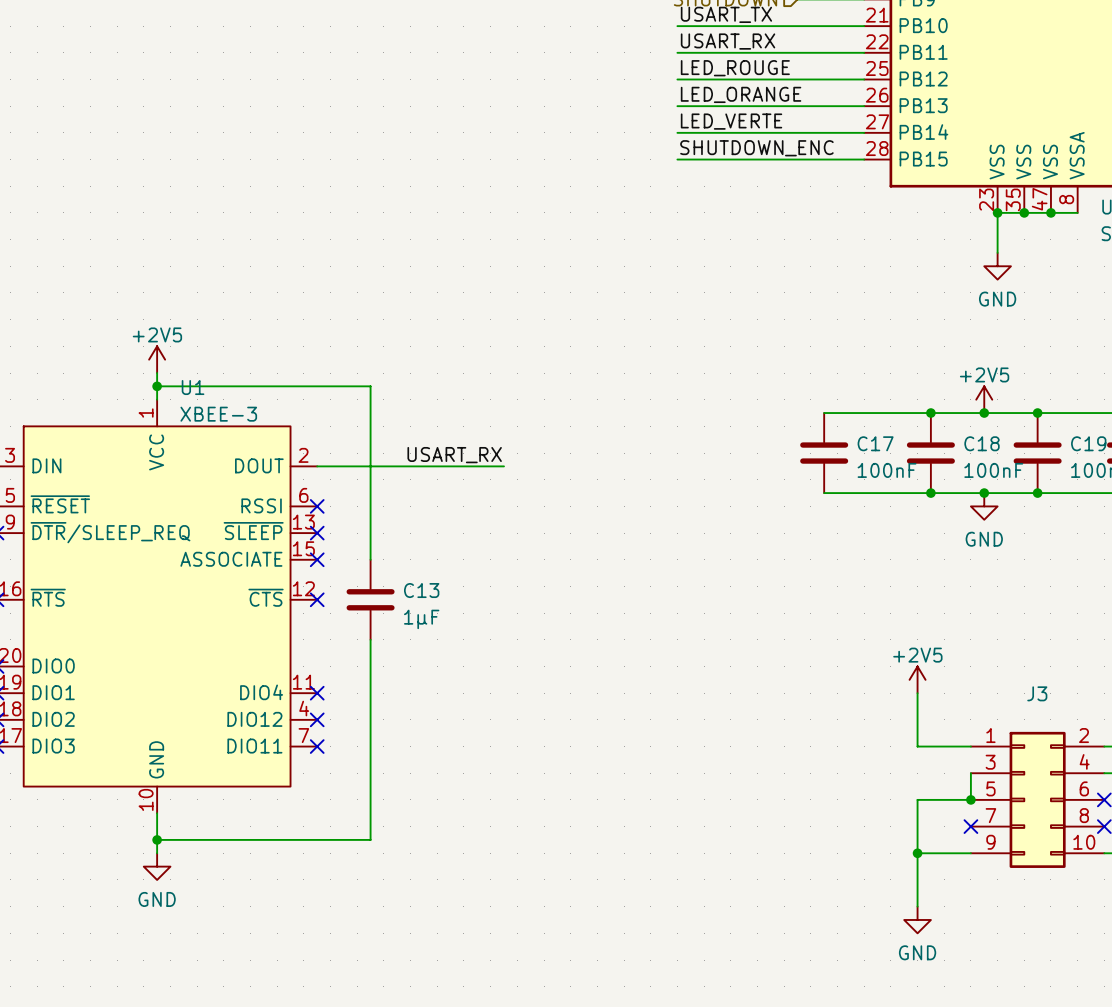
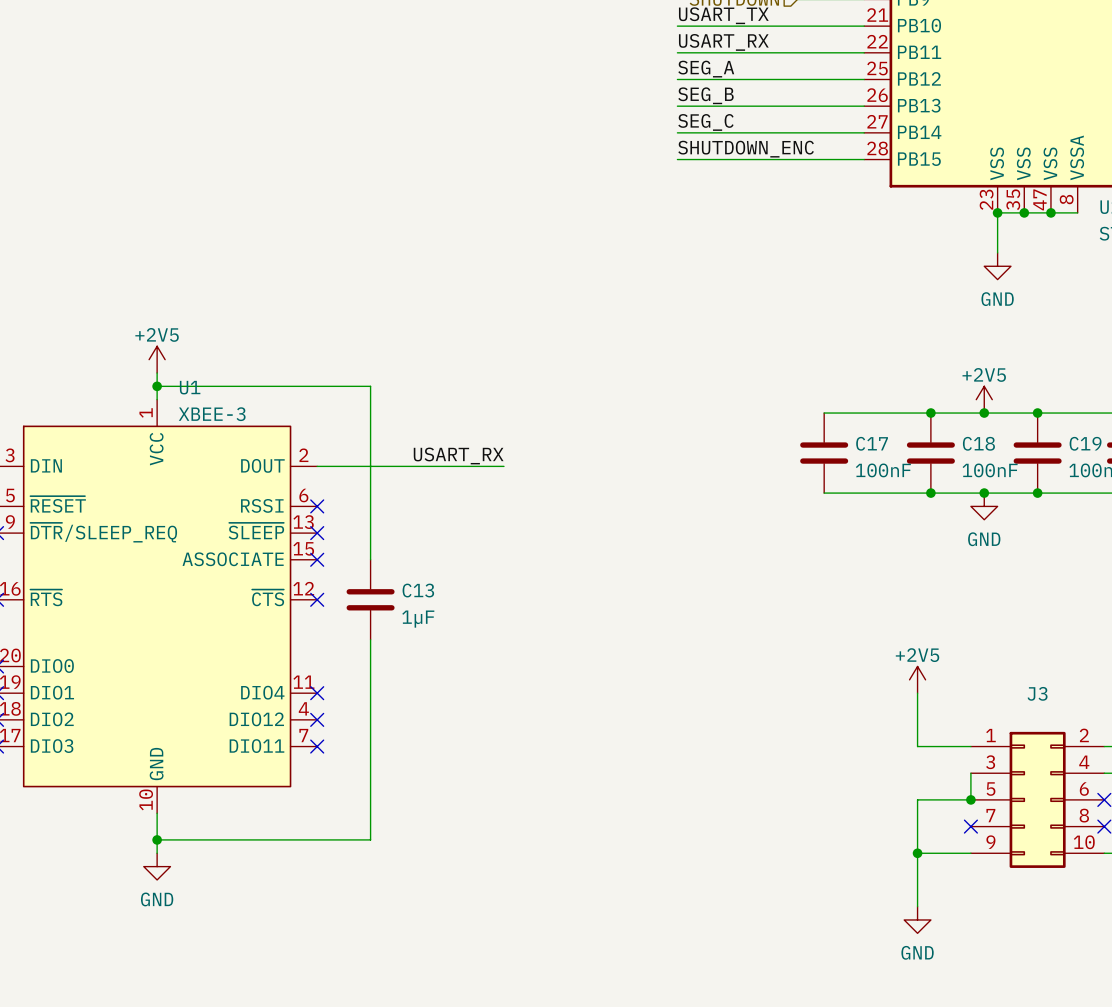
label: LED_ROUGE (735, 68) -> SEG_A (706, 69)
label: LED_ORANGE (741, 94) -> SEG_B (705, 95)
label: LED_VERTE (731, 121) -> SEG_C (705, 122)

